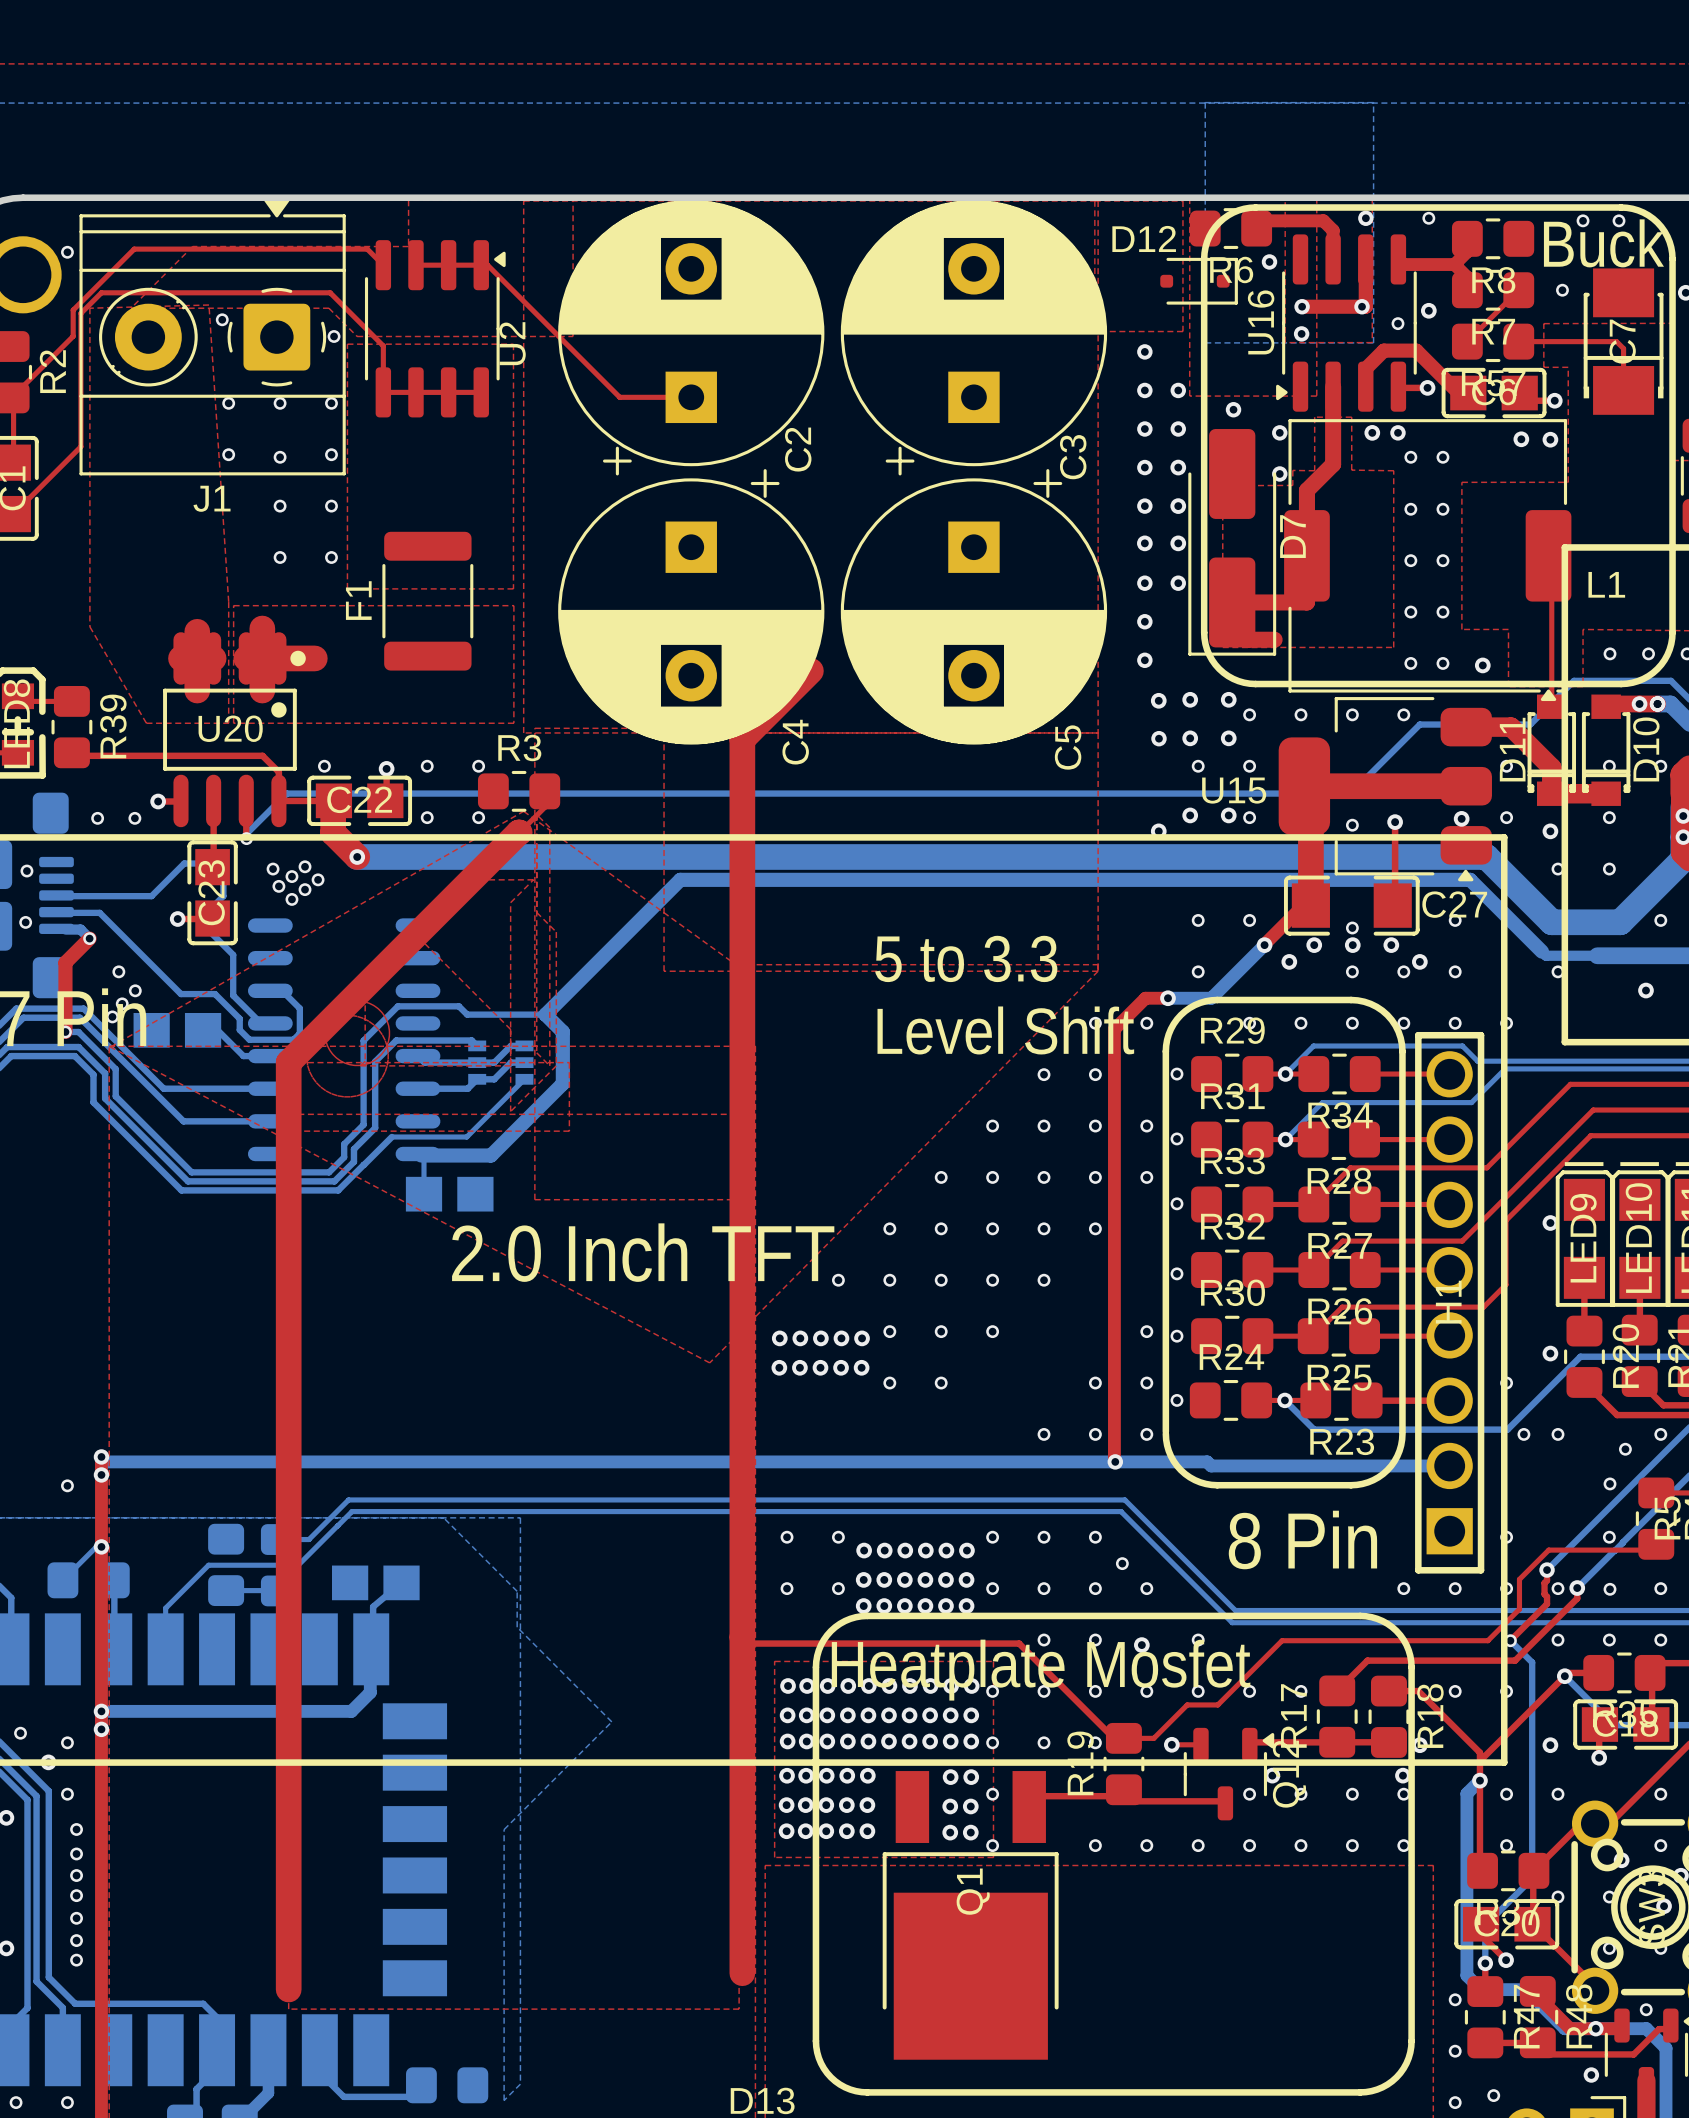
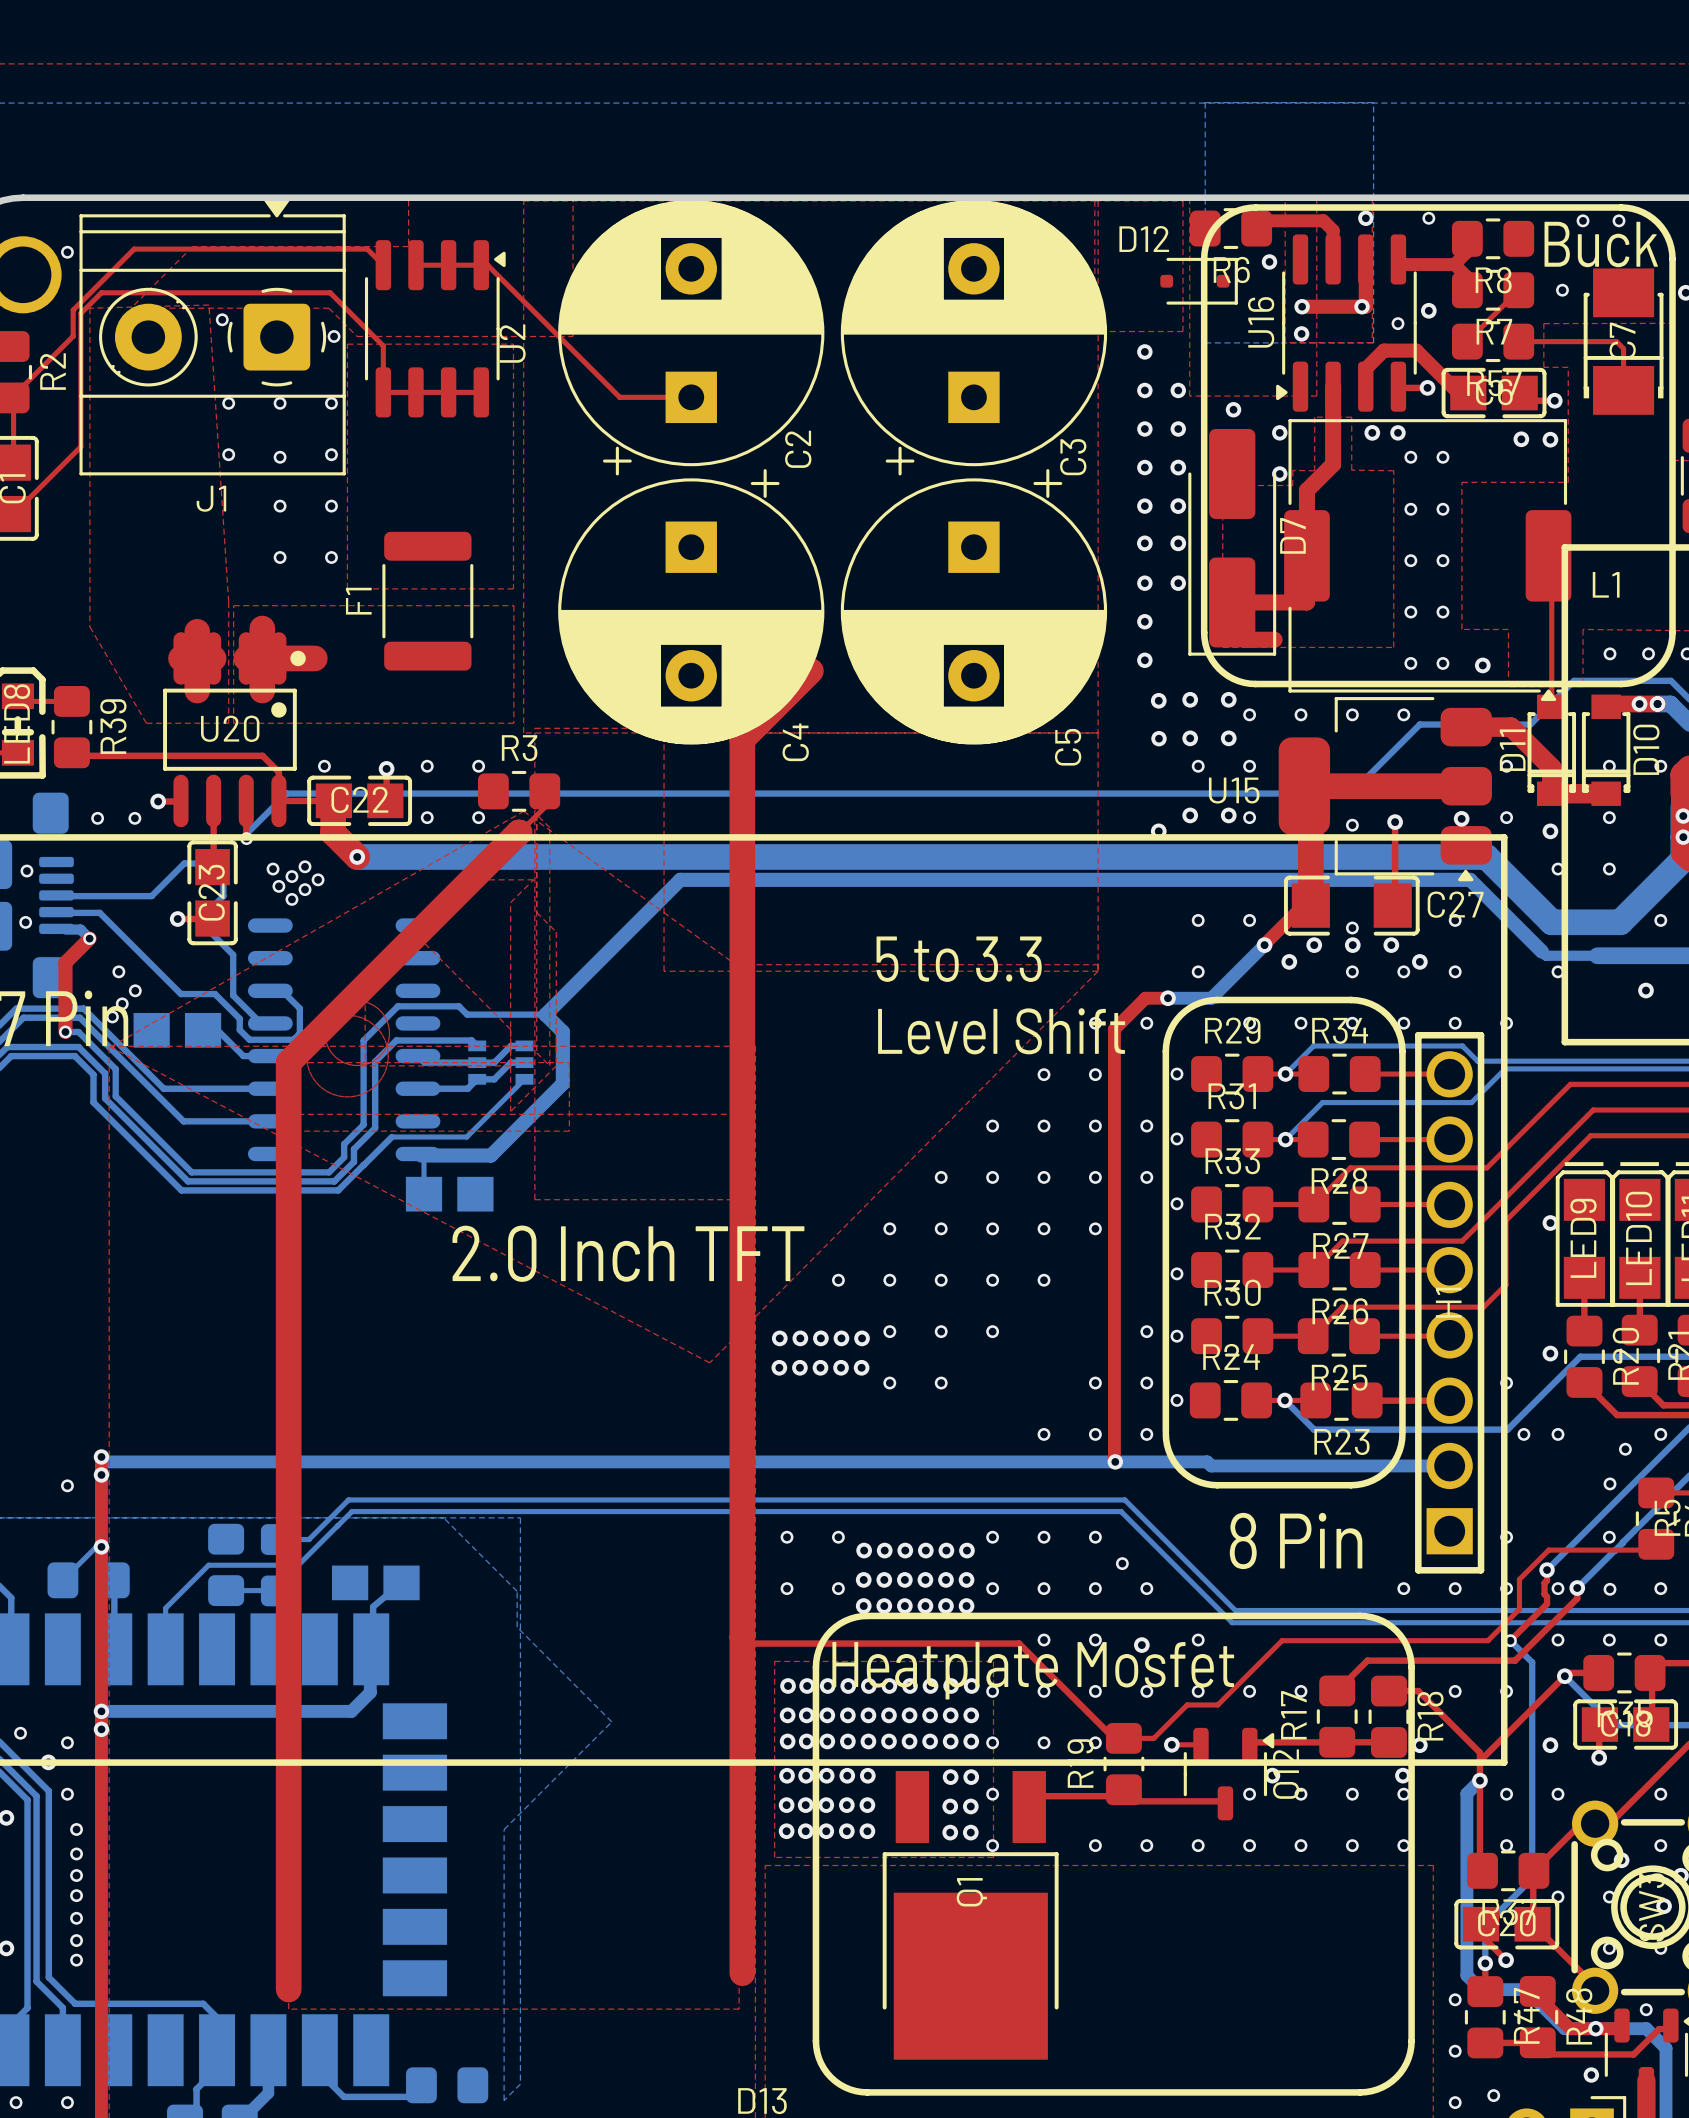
R34 name position: R34 (1340, 1115) -> R34 (1340, 1030)

